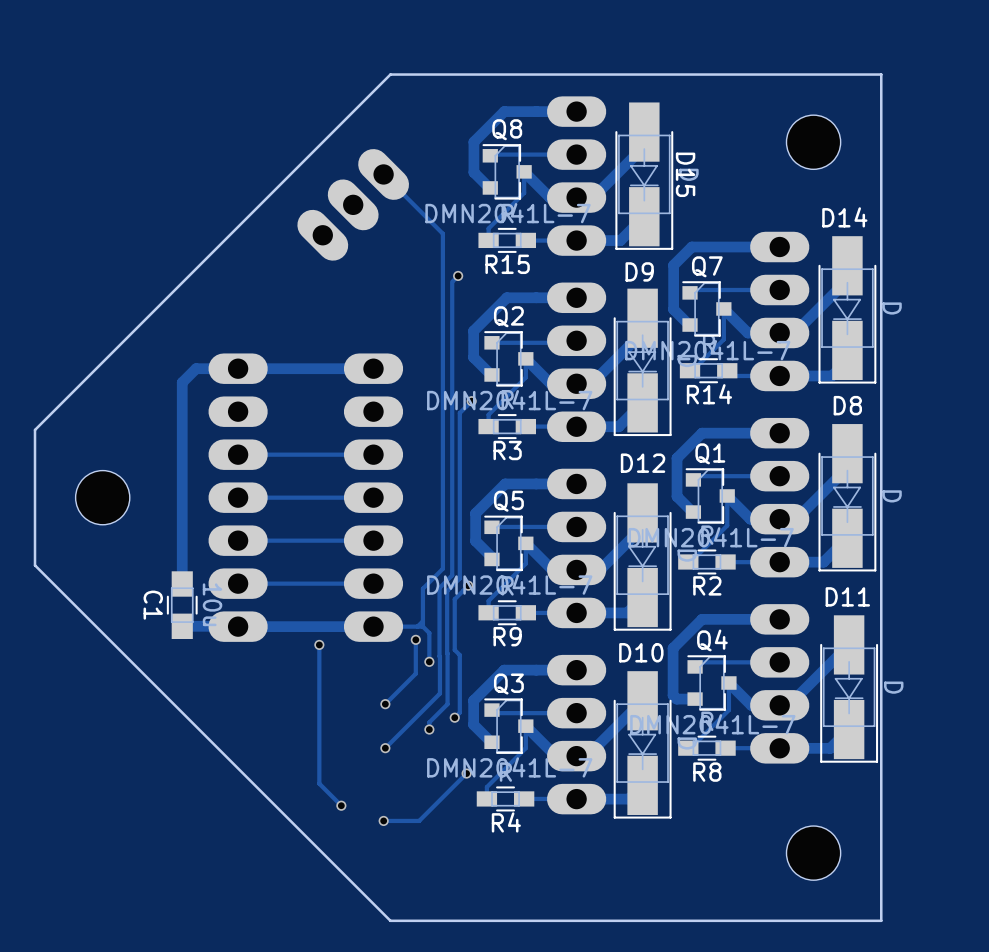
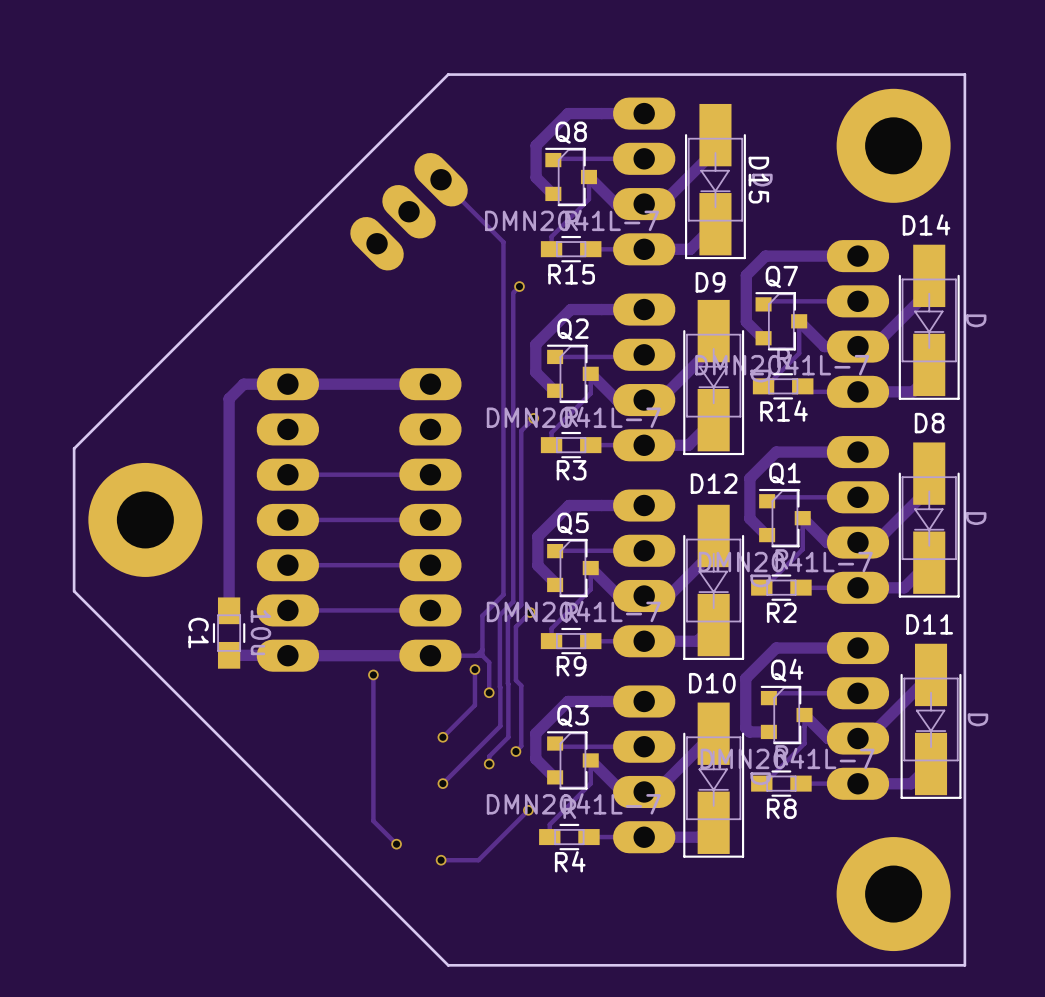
part footprint: [786, 115, 841, 170] -> [836, 88, 951, 203]
part footprint: [75, 470, 130, 525] -> [88, 462, 203, 577]
part footprint: [786, 826, 841, 881] -> [836, 837, 951, 952]

